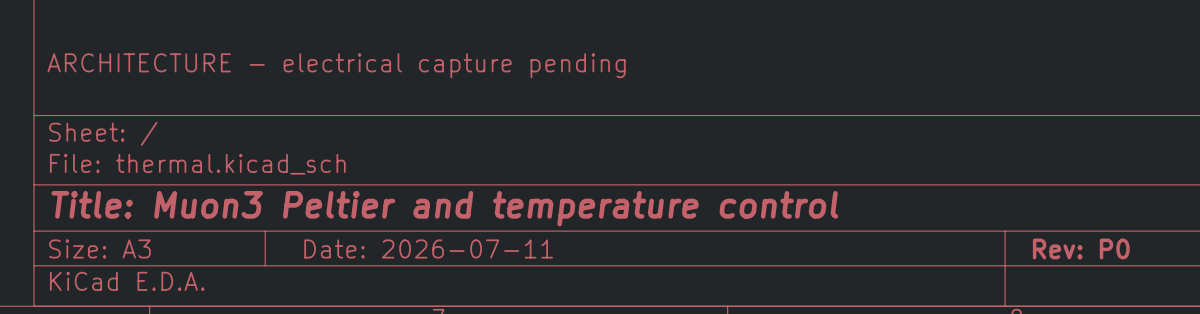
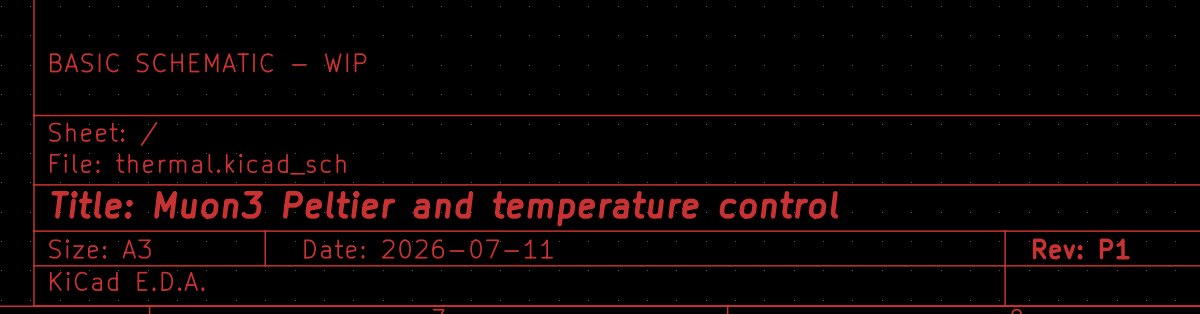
title block: ARCHITECTURE - electrical capture pending (336, 65) -> BASIC SCHEMATIC - WIP (208, 62)
title block: Rev: P0 (1081, 248) -> Rev: P1 (1081, 248)

